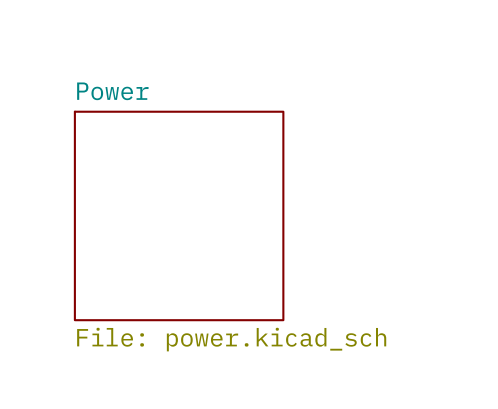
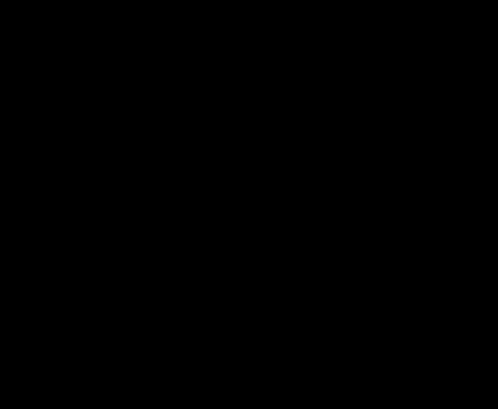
sheet Power: File: power.kicad_sch (179, 215) -> none

